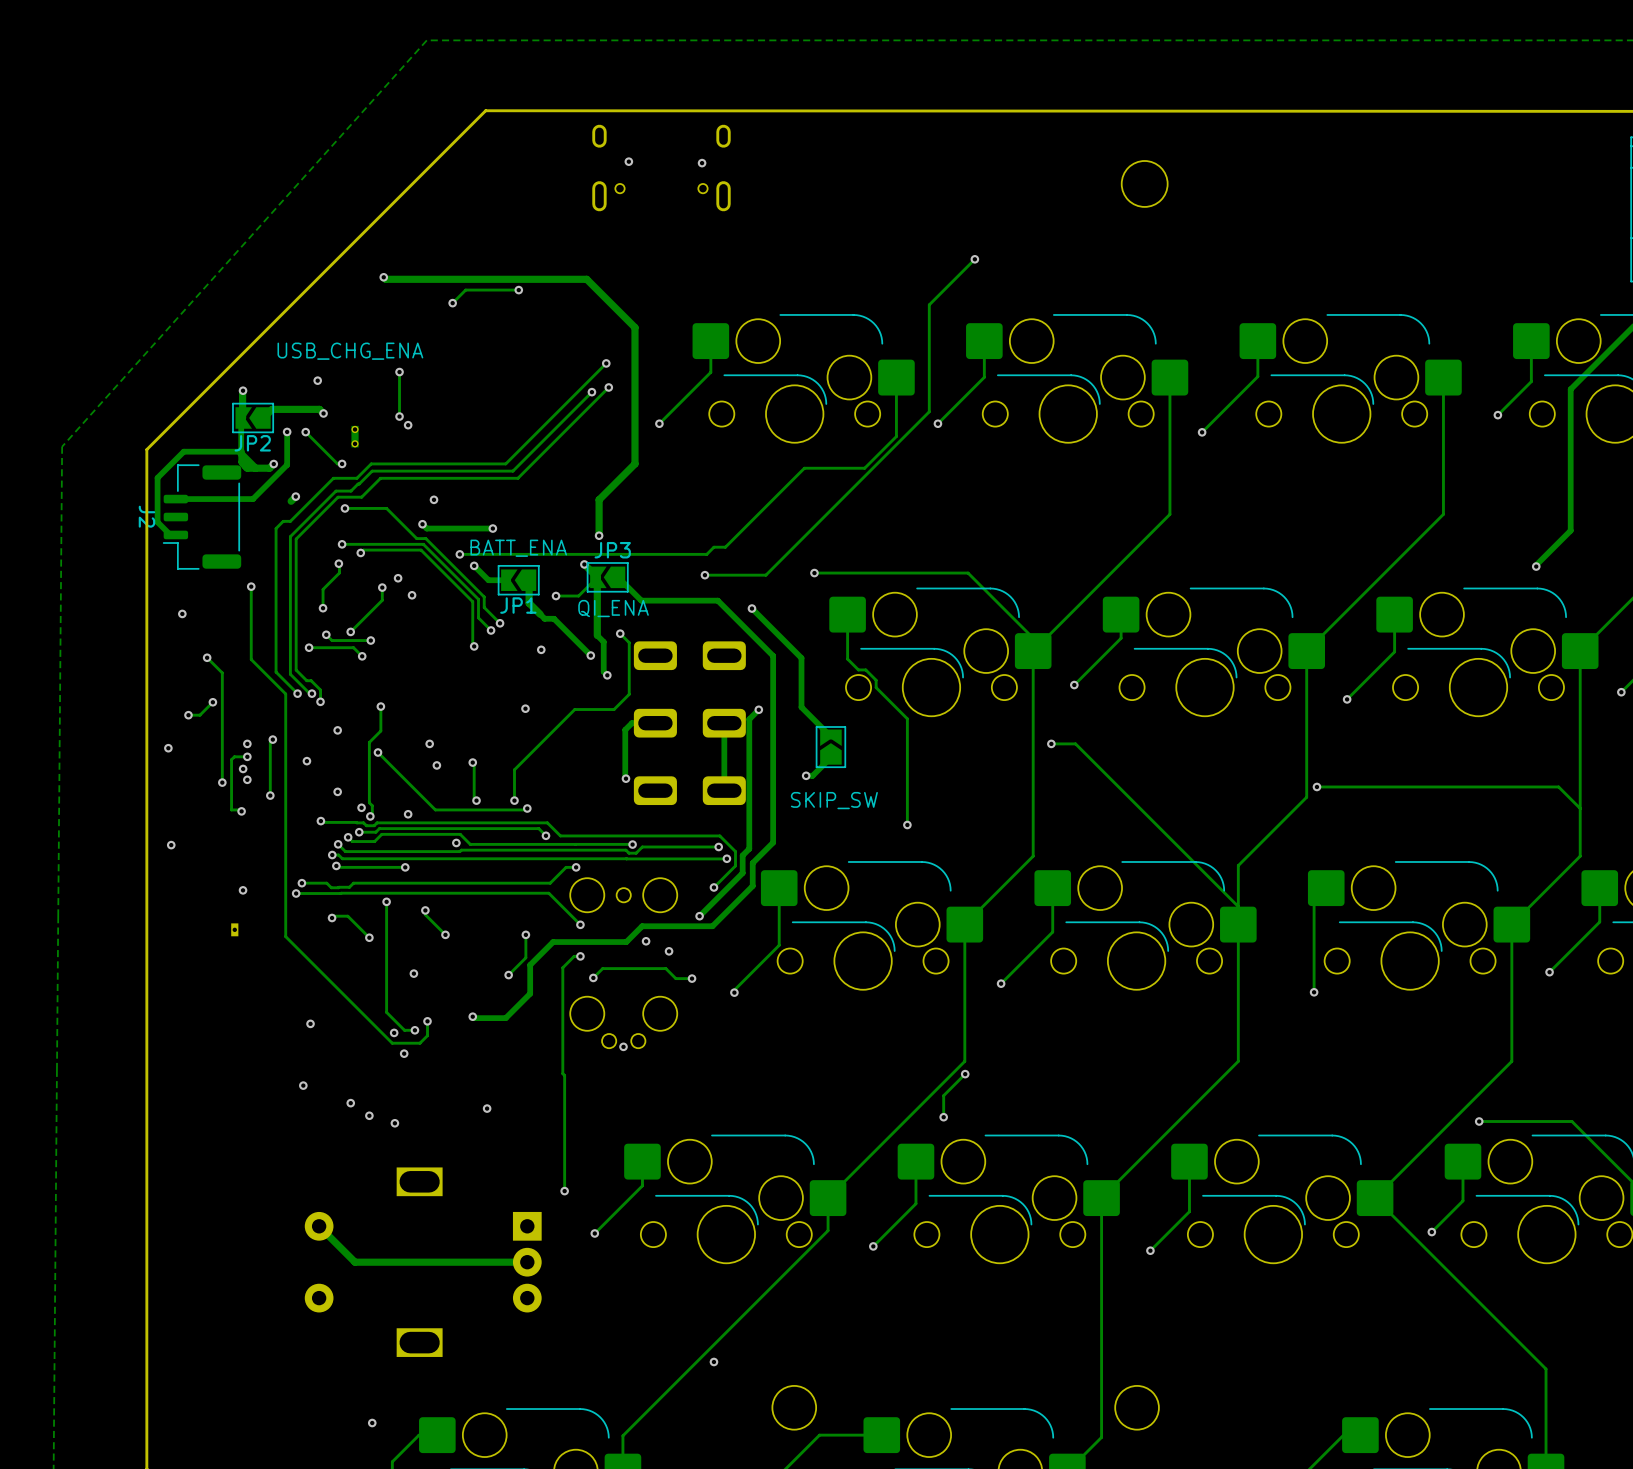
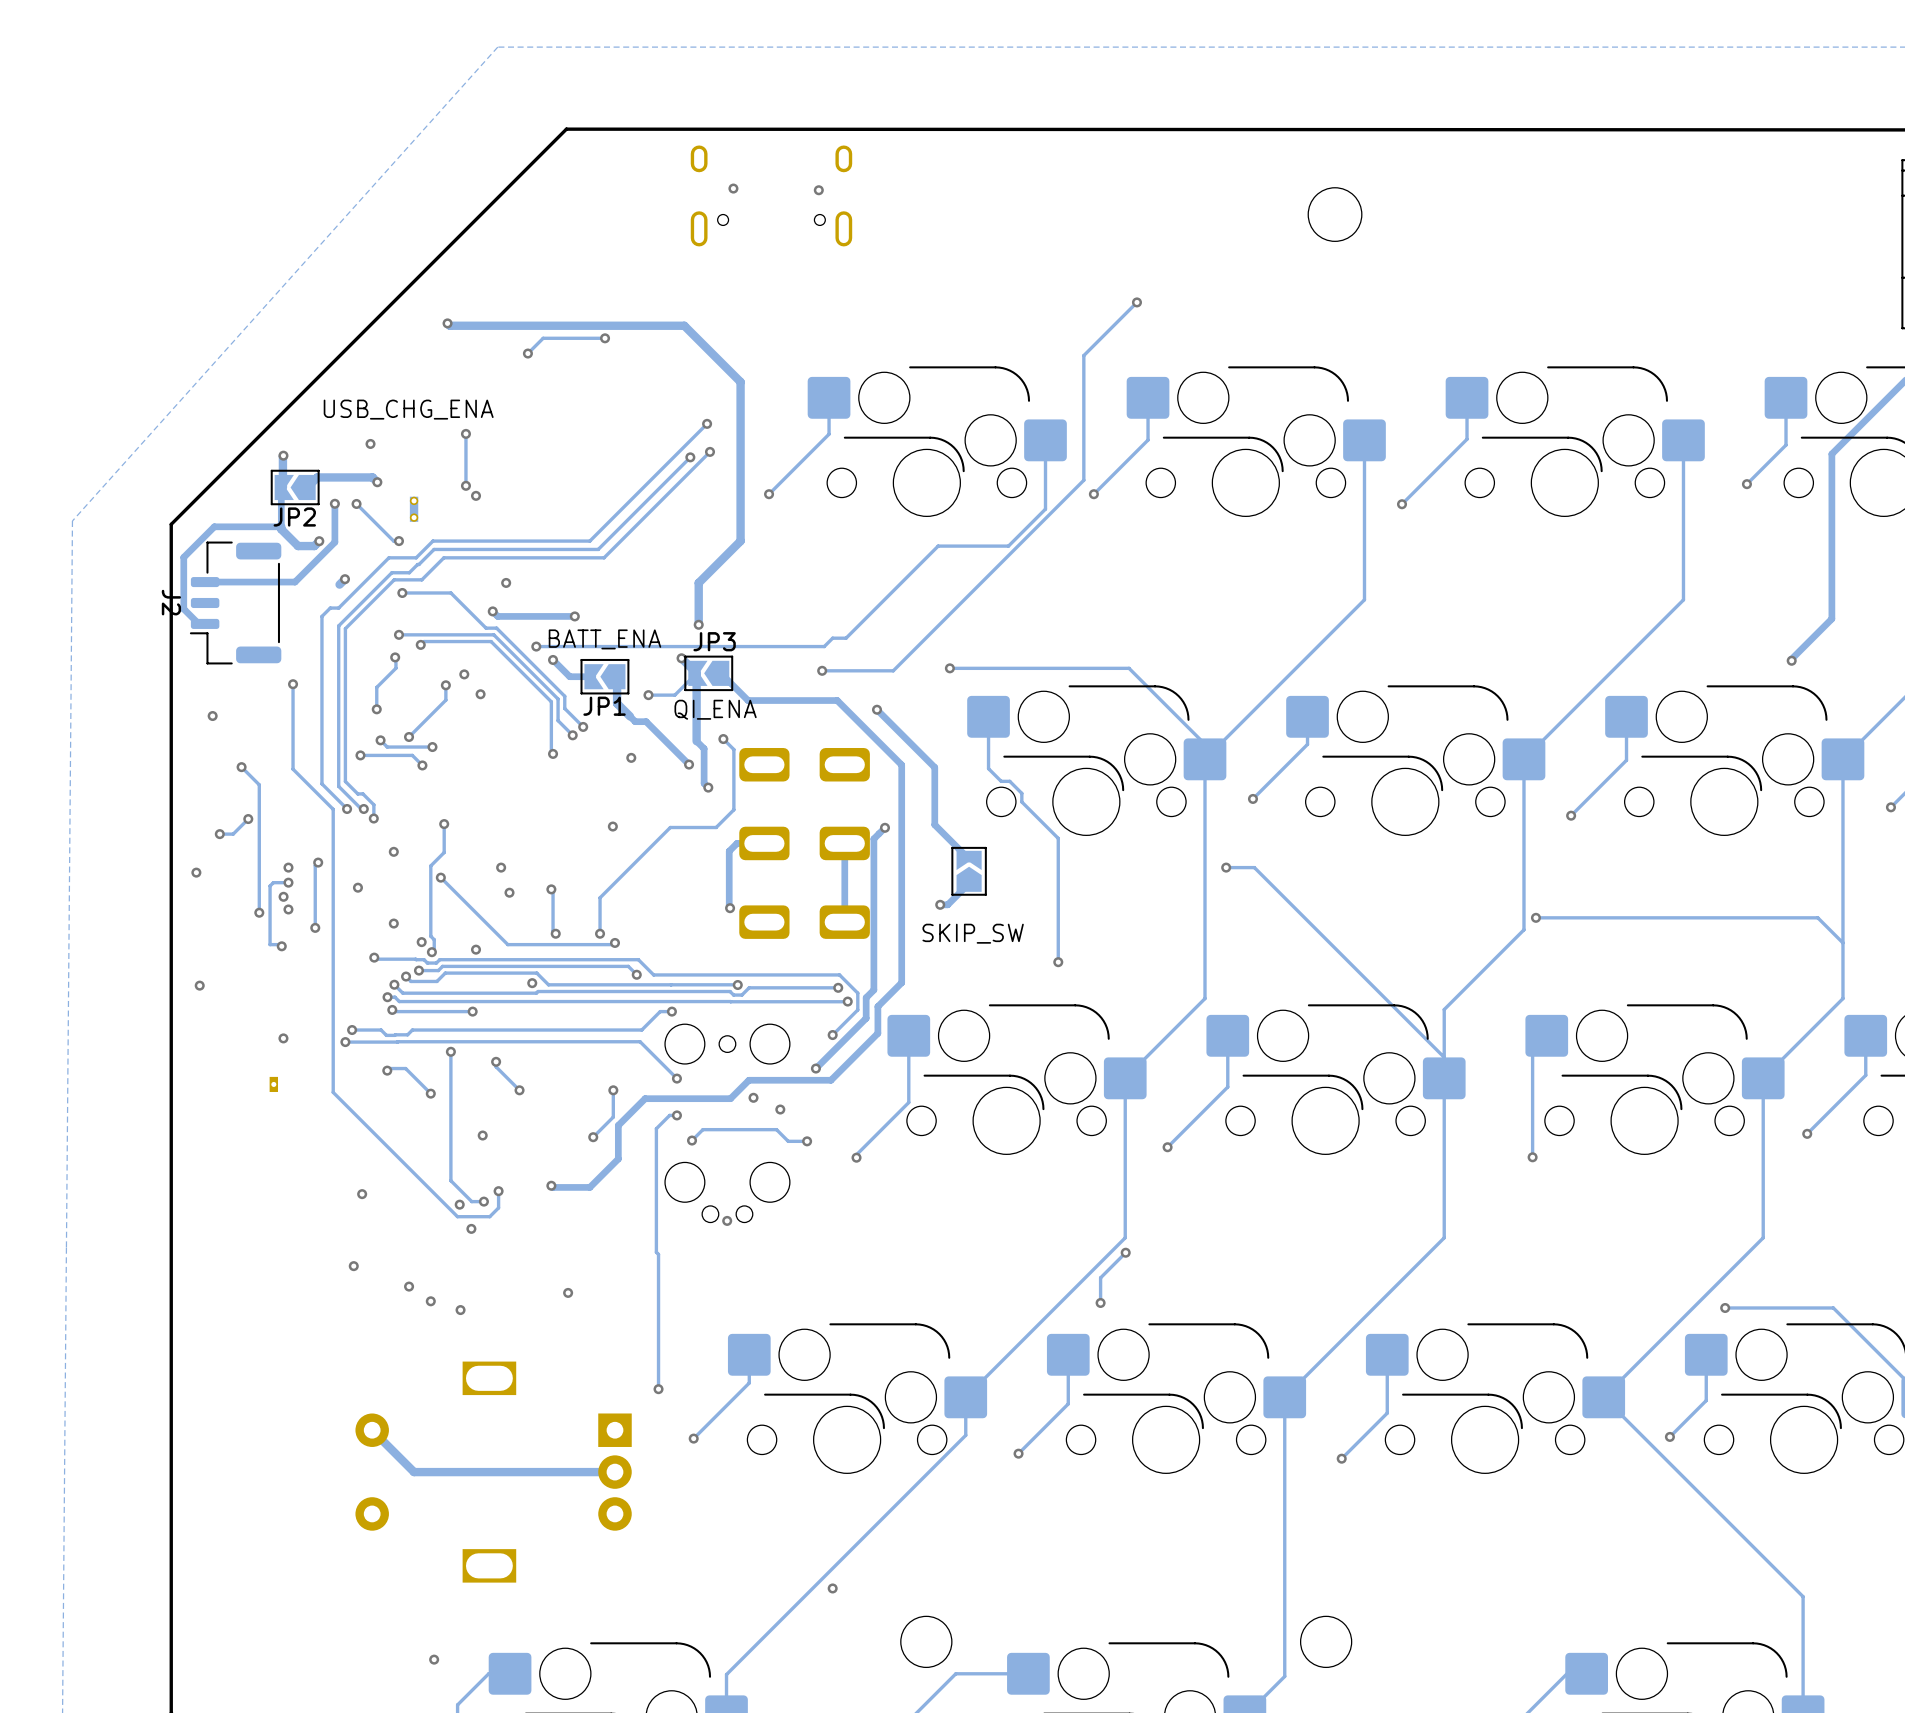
track: (241, 451) (241, 462) (247, 468) (255, 468) -> none

